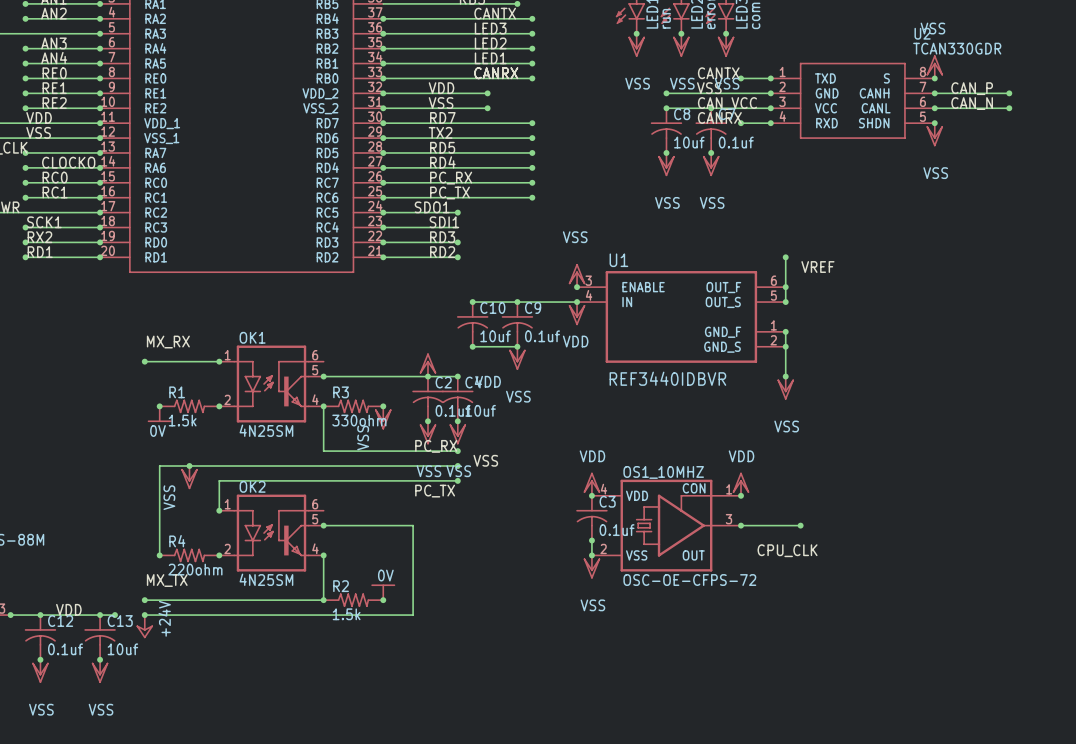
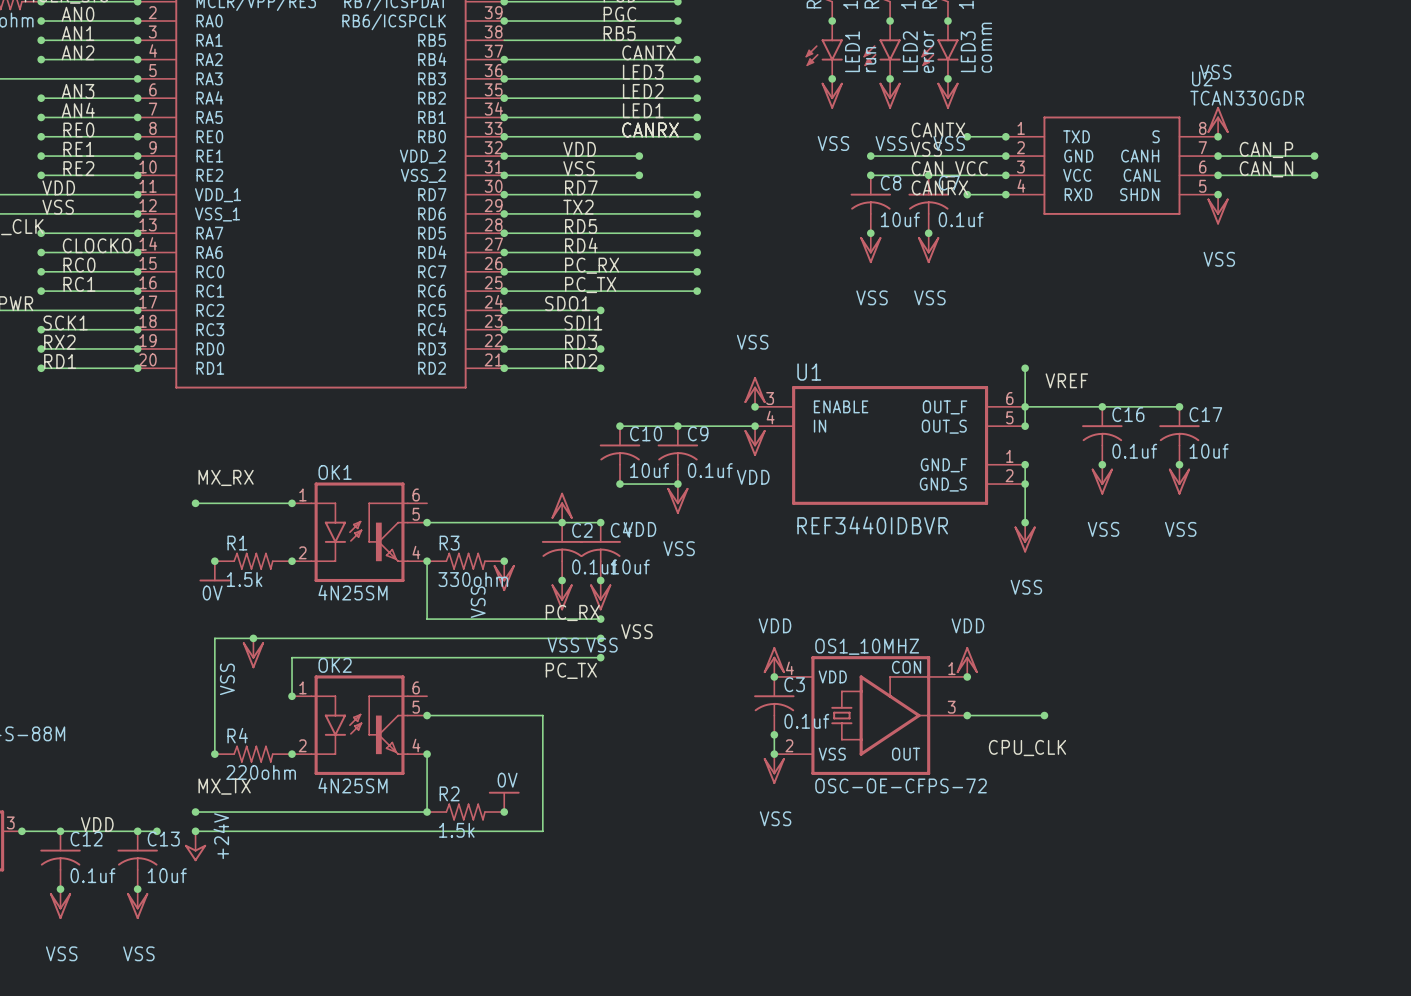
wire: none -> (1025, 406) (1179, 406)
junction: none -> (1102, 406)
junction: none -> (1179, 406)
C16: none -> 0.1uf (1102, 435)
C17: none -> 10uf (1179, 435)
junction: none -> (1102, 464)
junction: none -> (1179, 464)
power symbol: none -> VSS (1102, 479)
power symbol: none -> VSS (1179, 479)

